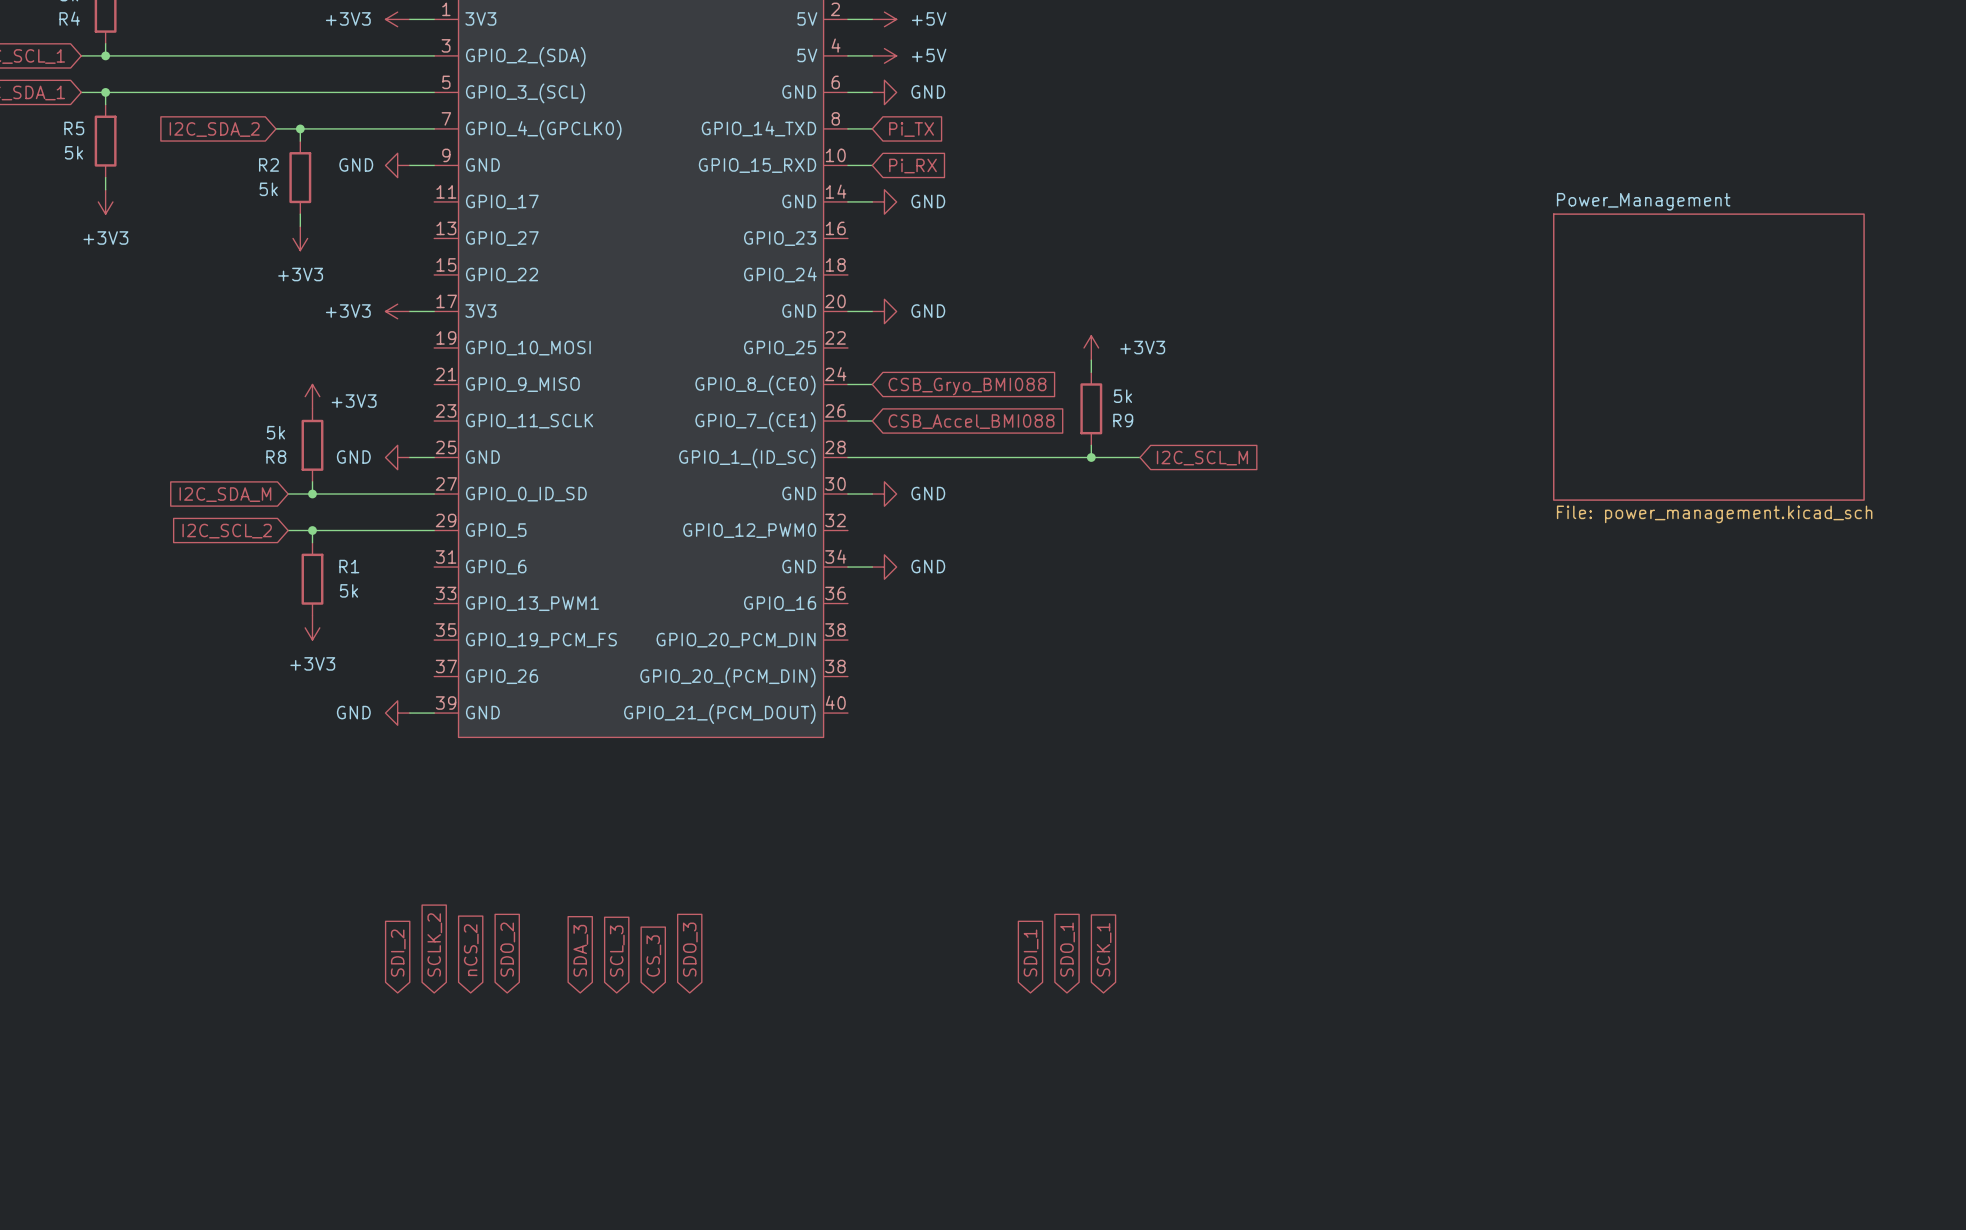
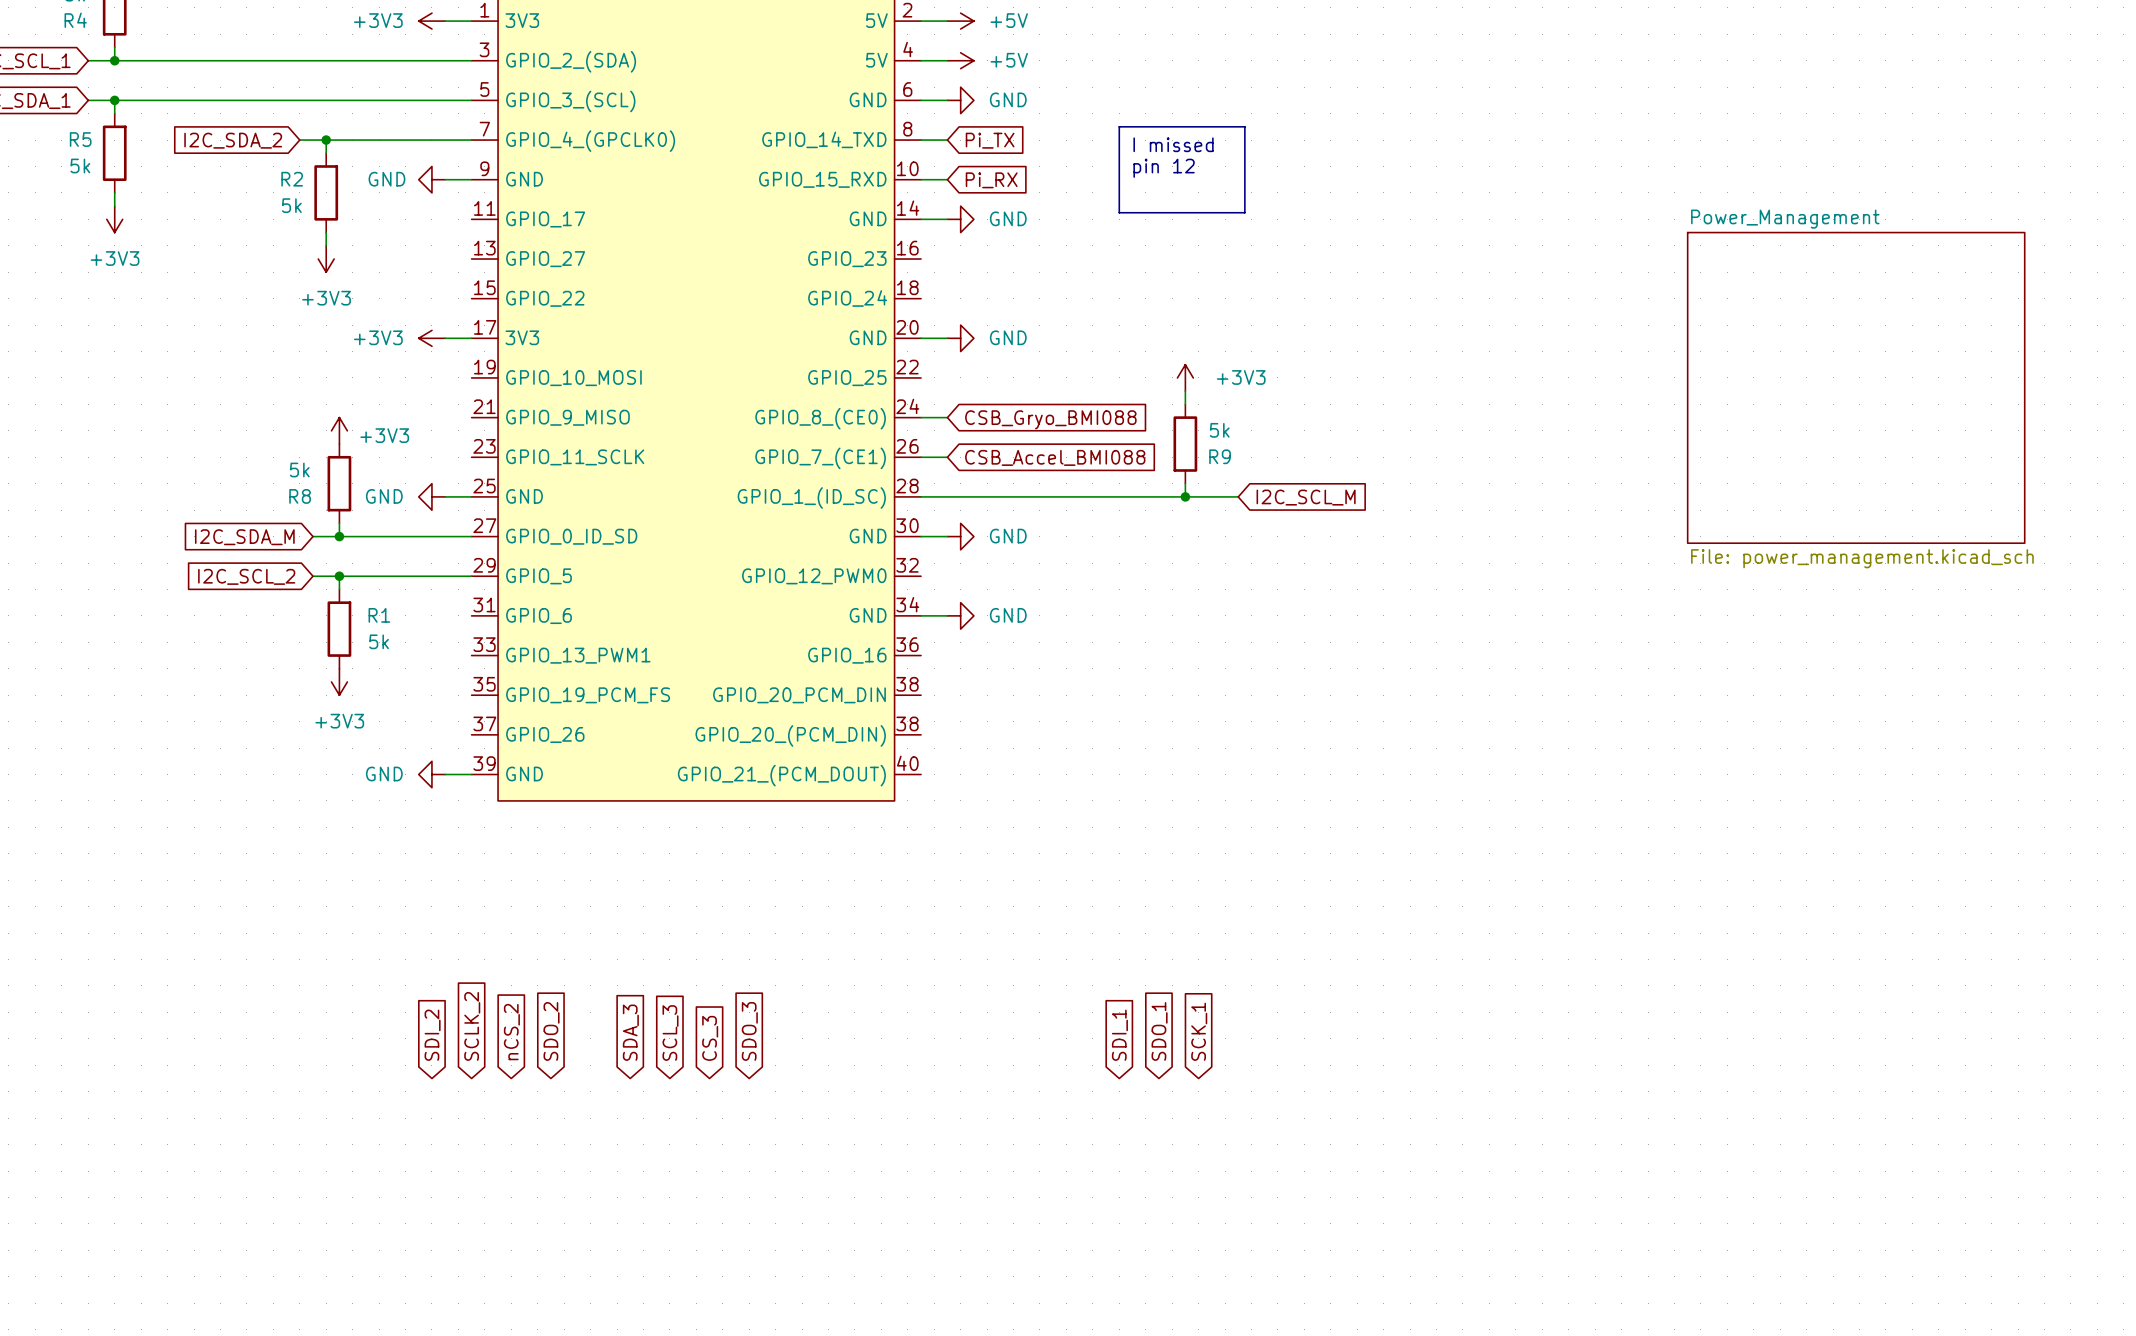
line: none -> (1119, 126) (1244, 126) (1244, 212) (1119, 212) (1119, 126)
text: none -> I missed (1173, 144)
text: none -> pin 12 (1164, 168)

